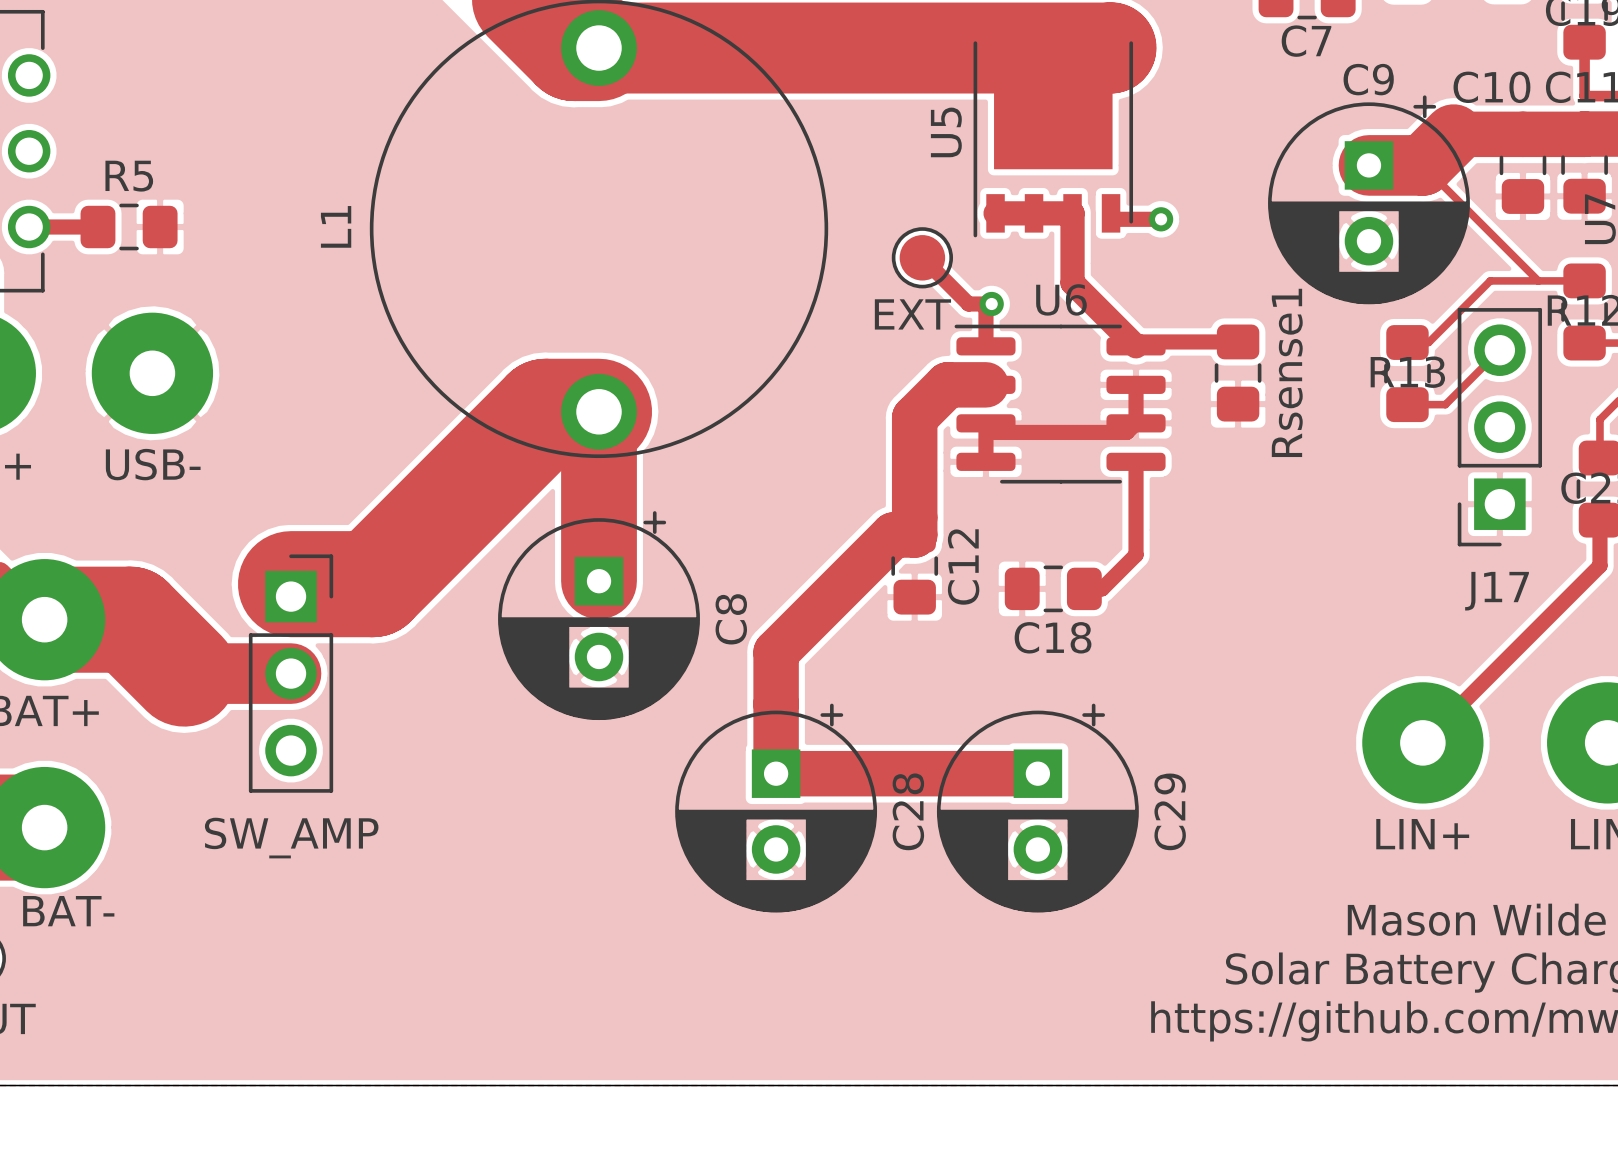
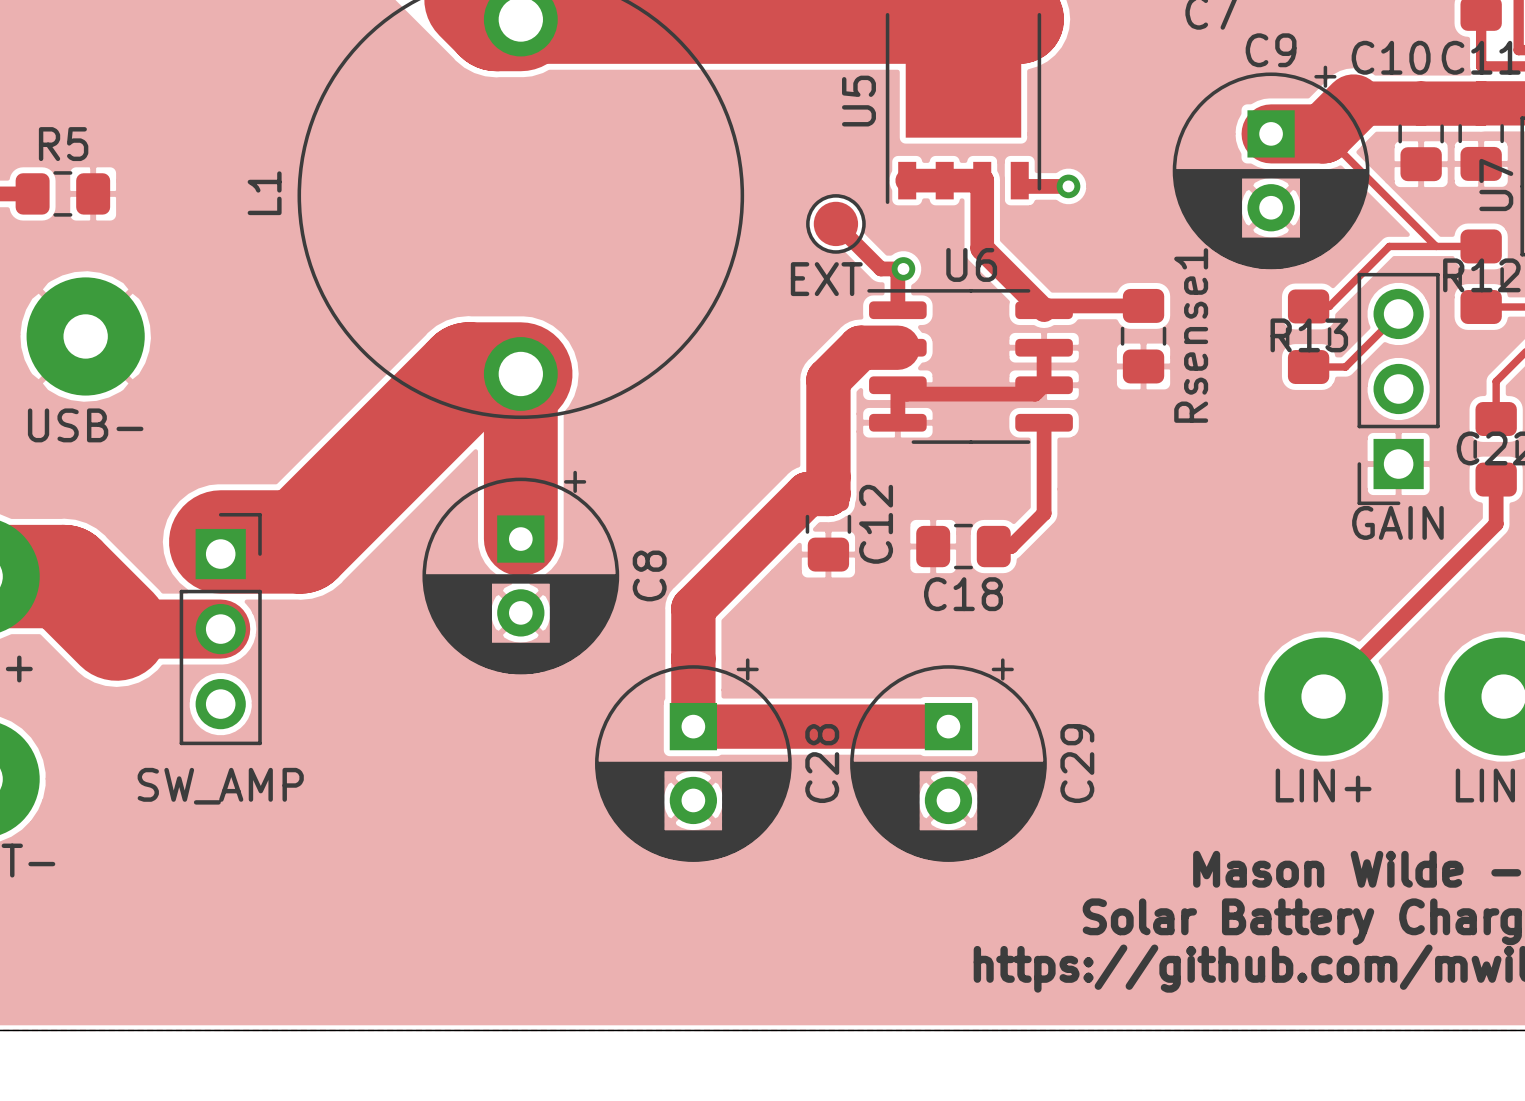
J17 value: none -> GAIN (1397, 522)
J17 name: J17 (1497, 591) -> none

